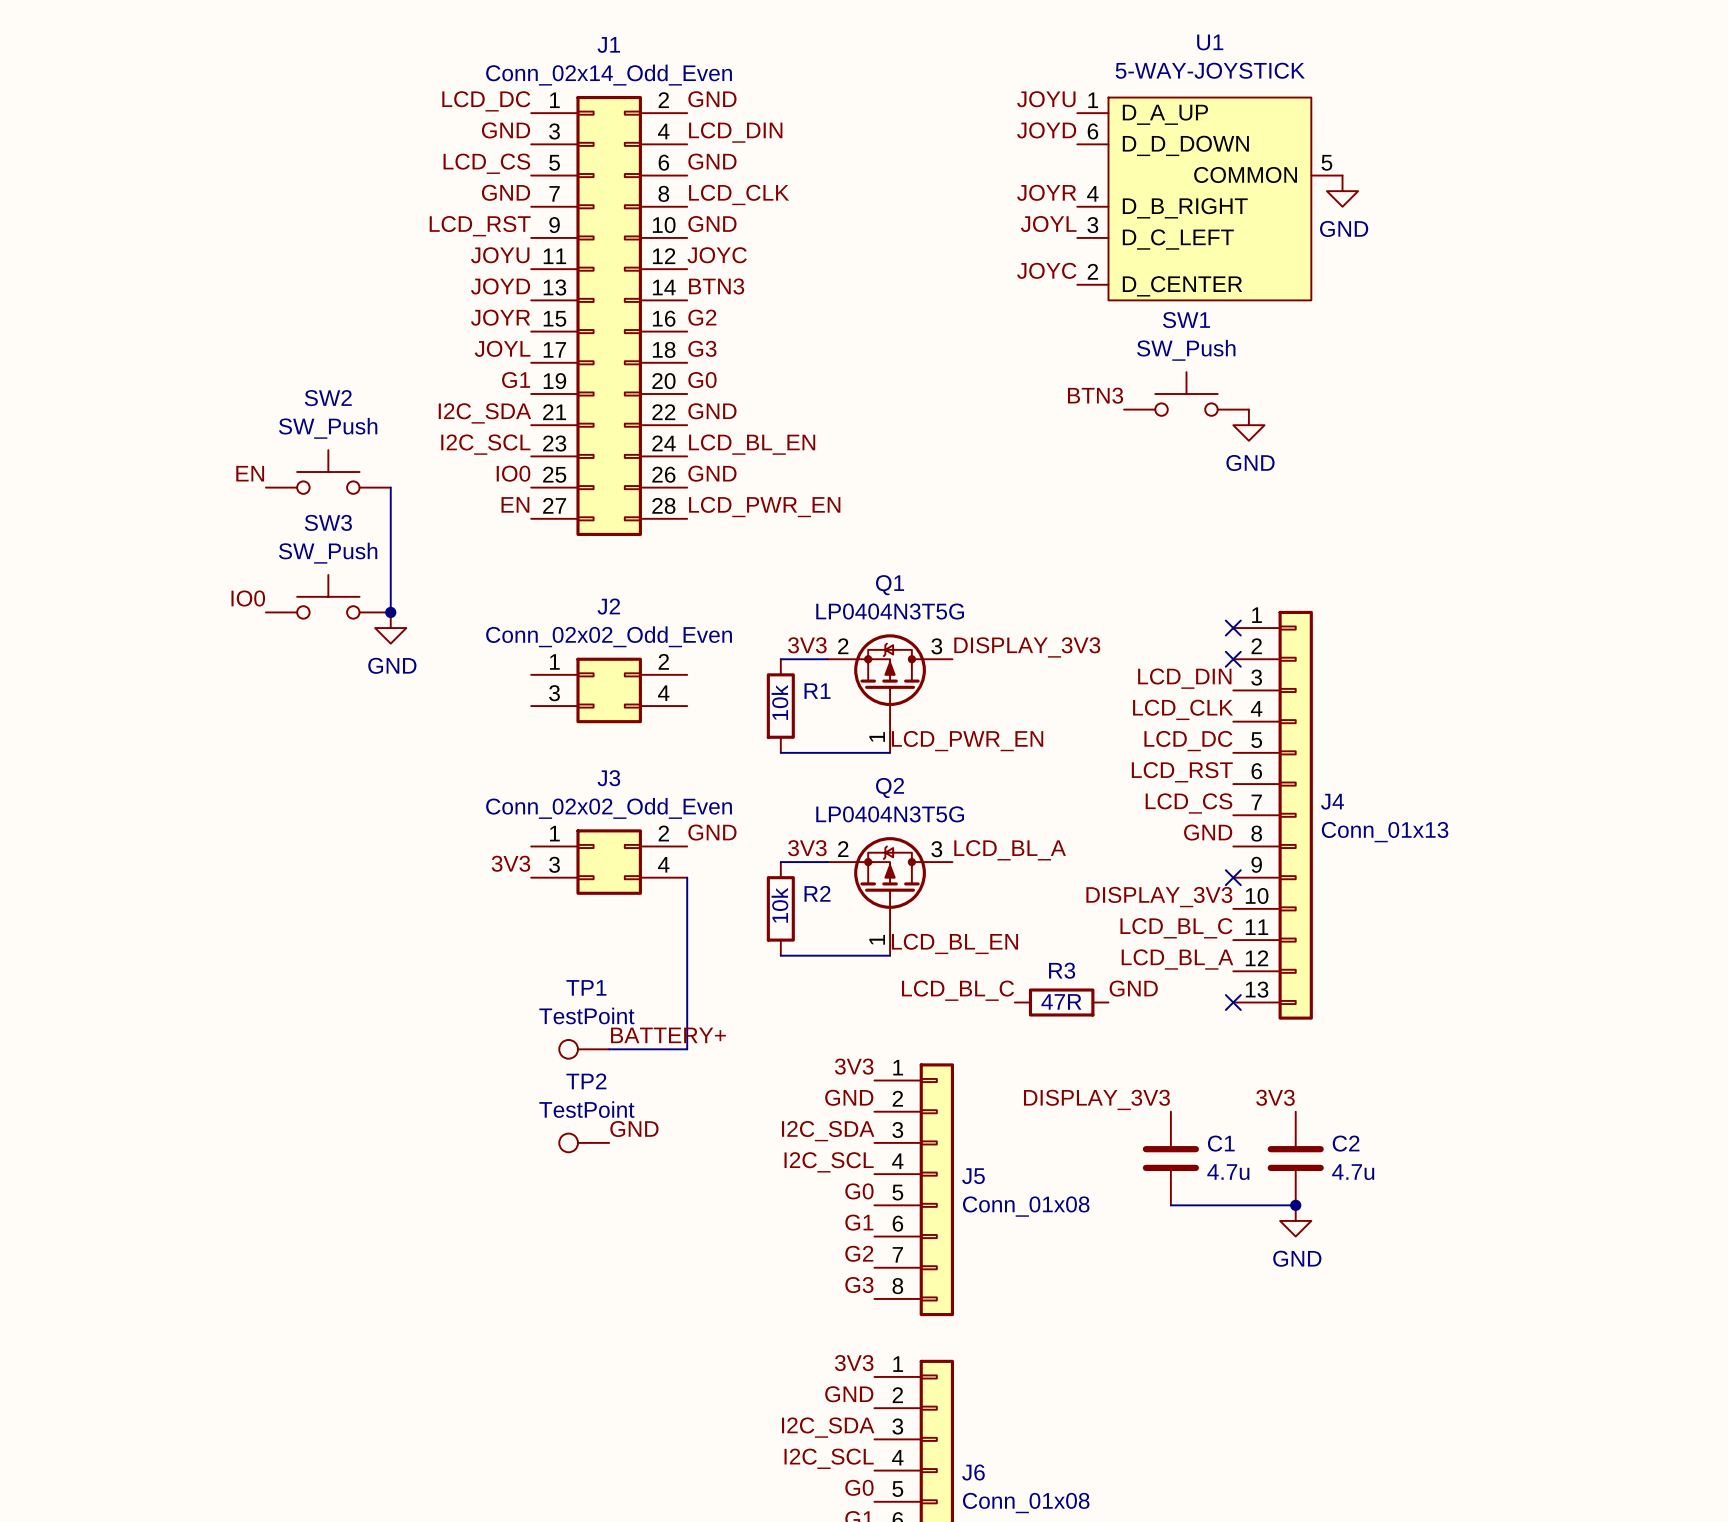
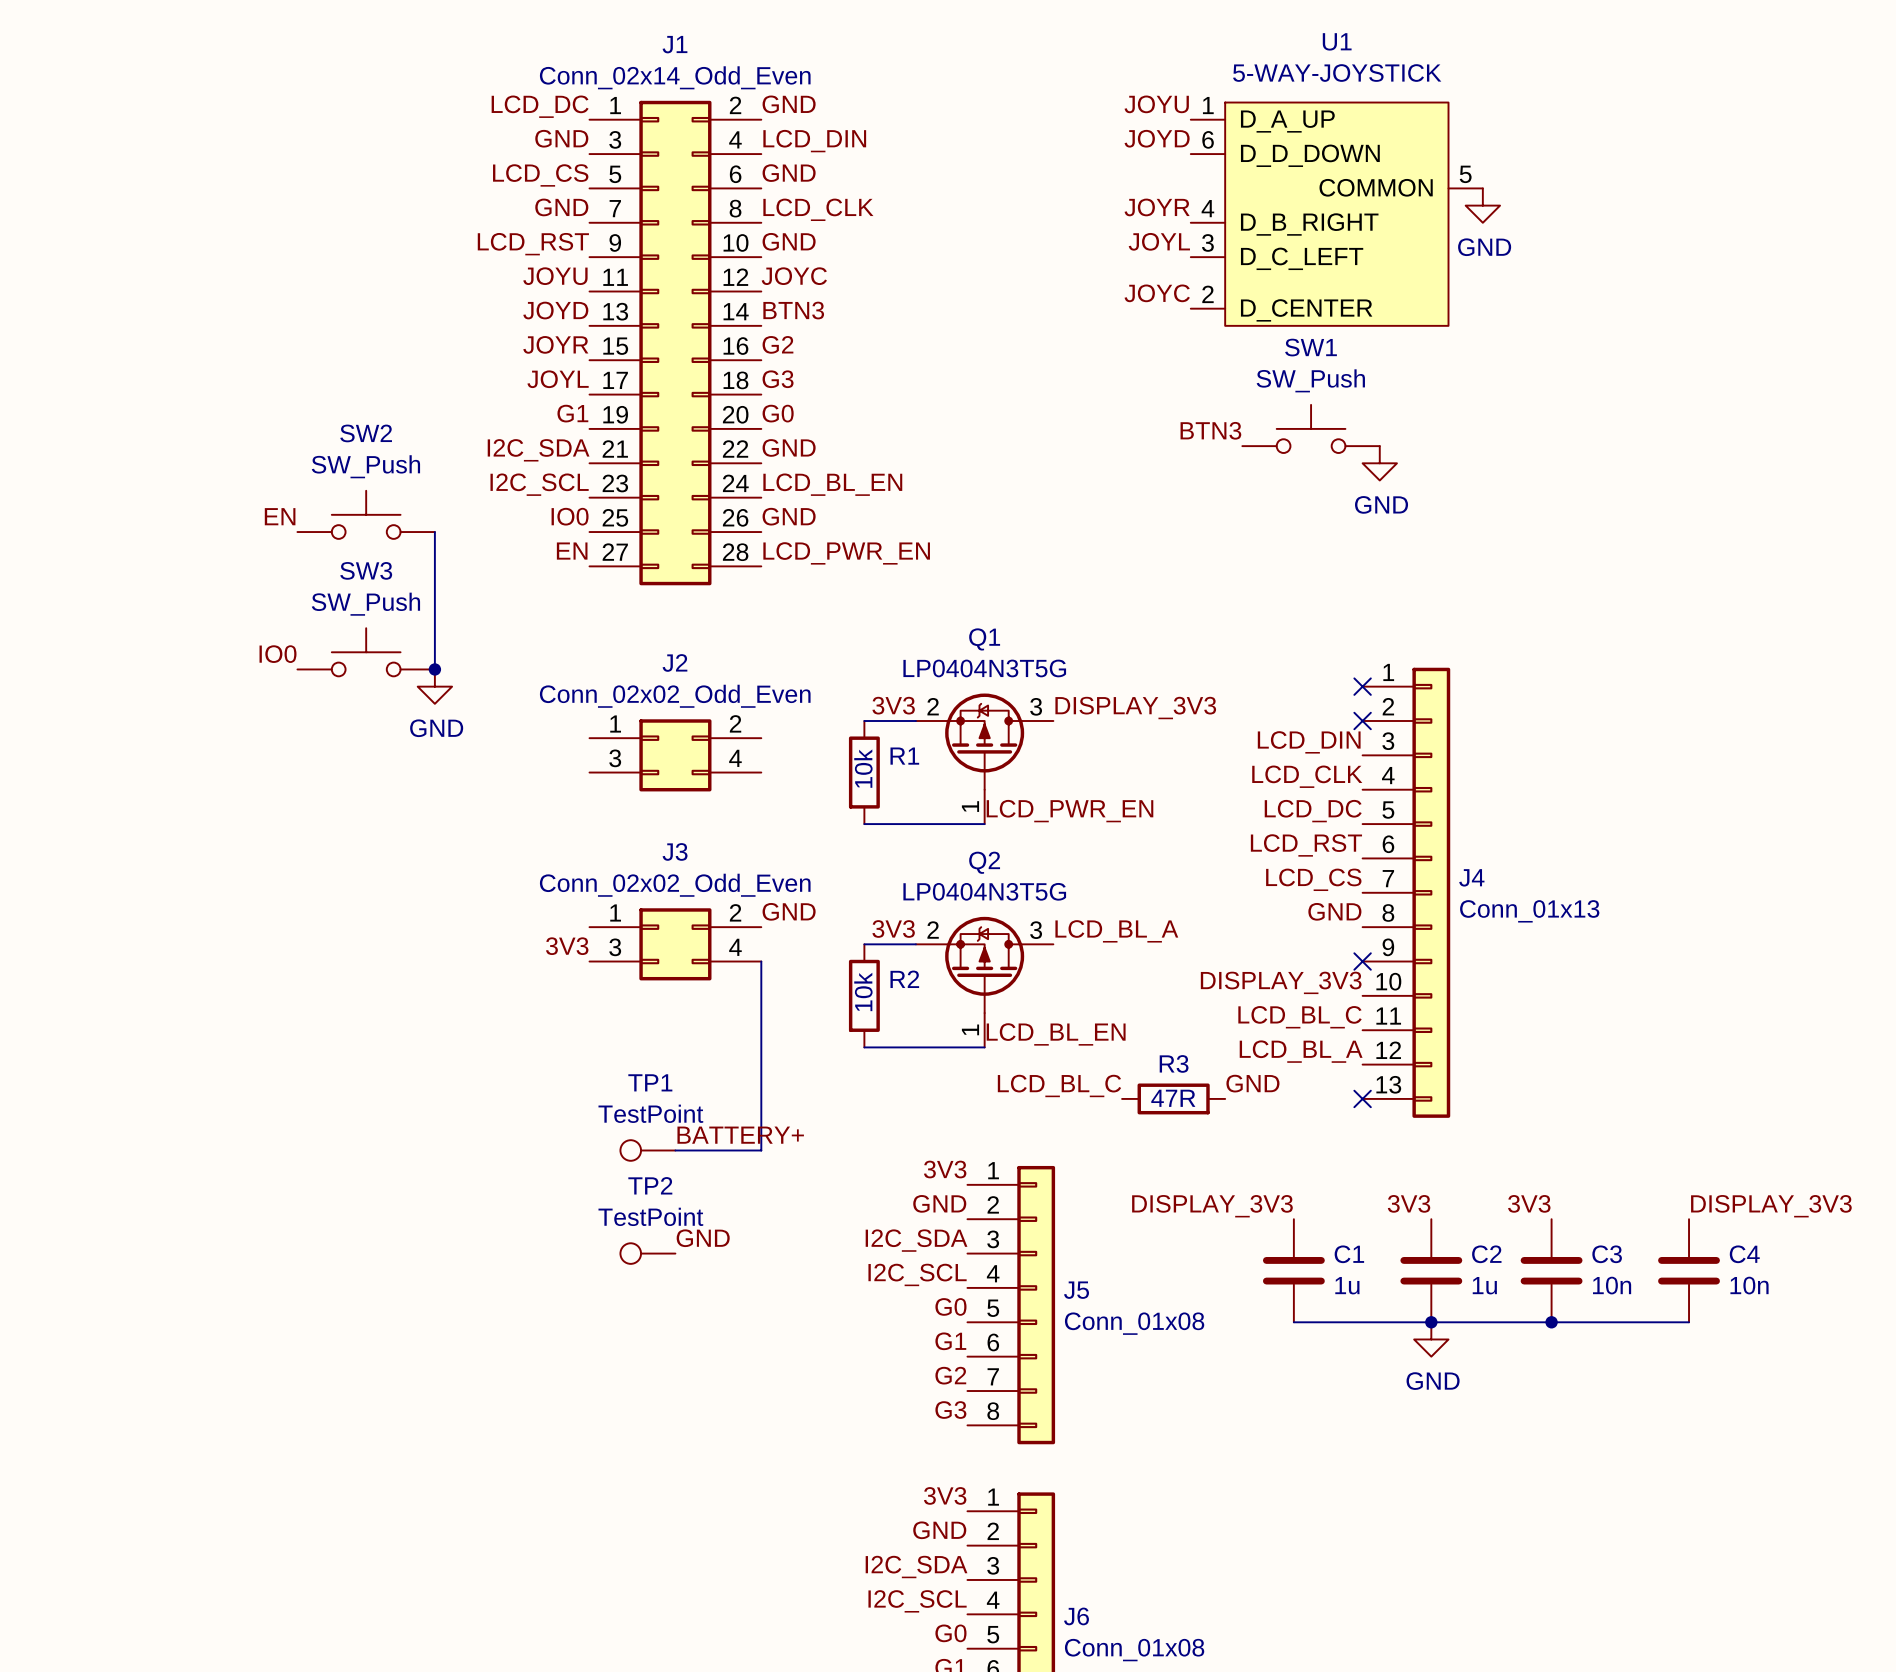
label: none -> 3V3 (1529, 1203)
label: none -> DISPLAY_3V3 (1771, 1206)
C3: none -> 10n (1551, 1270)
C4: none -> 10n (1689, 1270)
C1 value: 4.7u (1228, 1172) -> 1u (1347, 1285)
C2 value: 4.7u (1353, 1172) -> 1u (1484, 1285)
wire: none -> (1431, 1322) (1689, 1322)
junction: none -> (1551, 1322)

